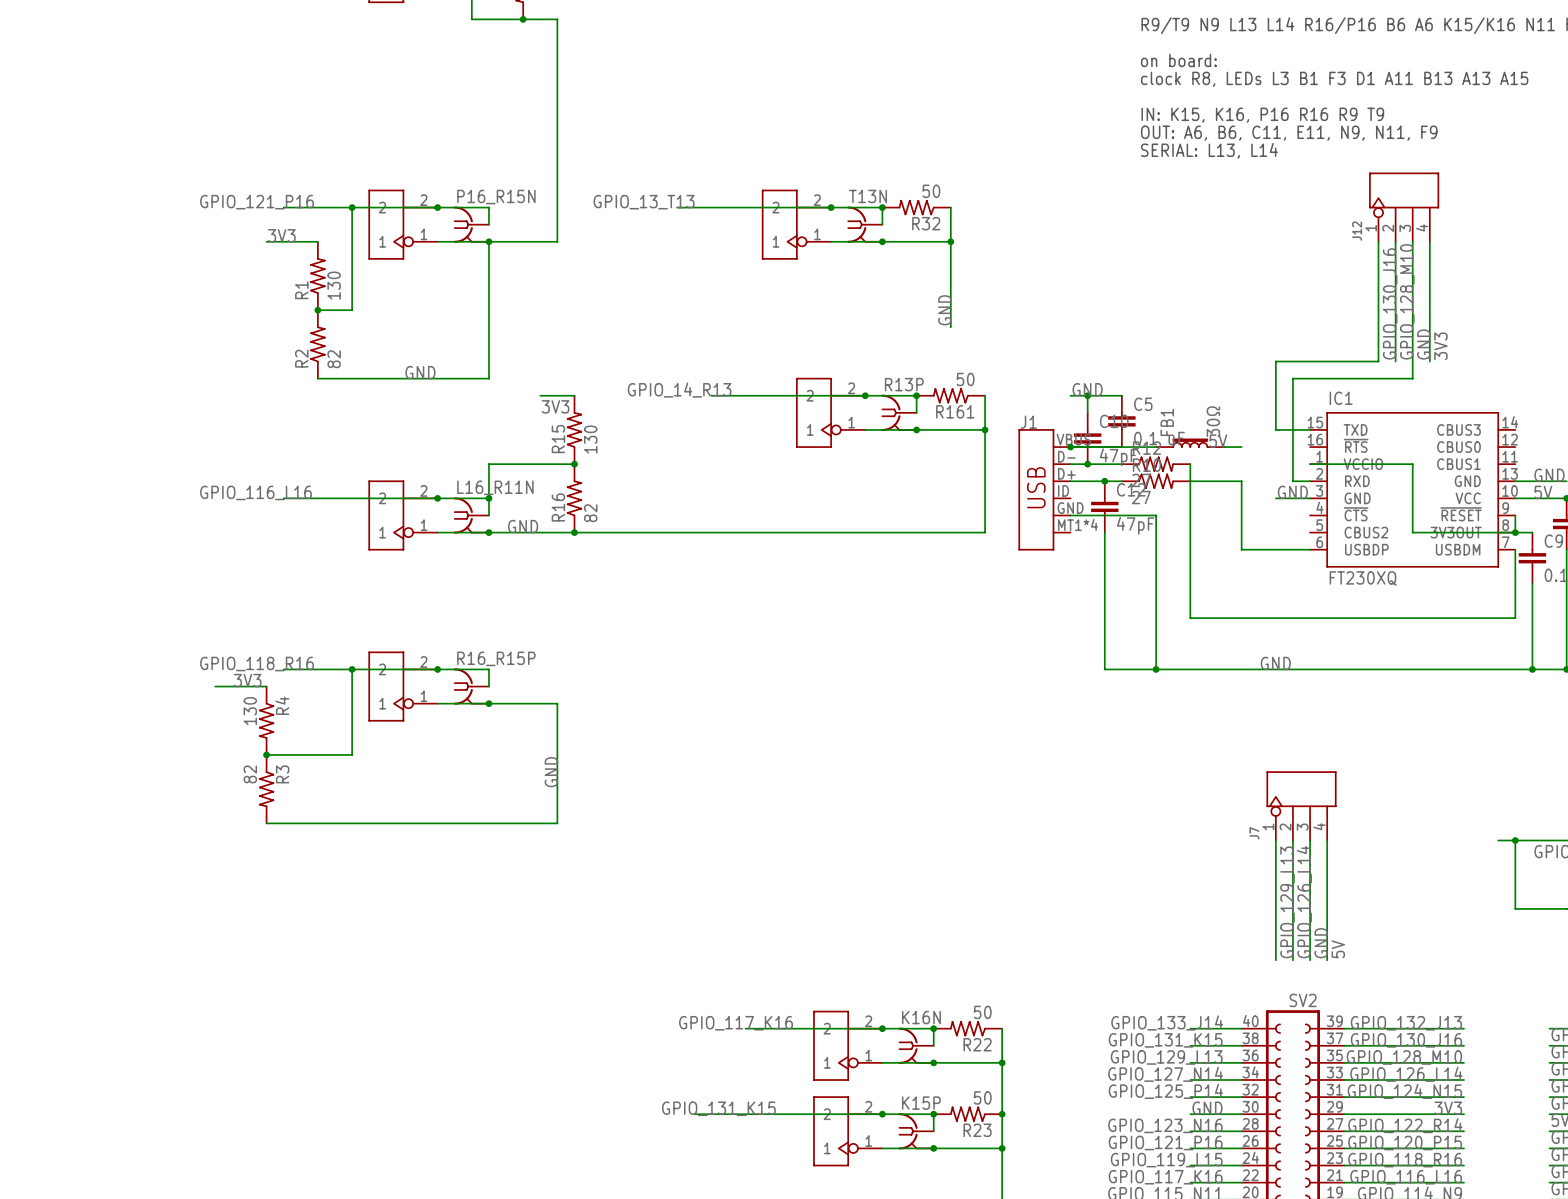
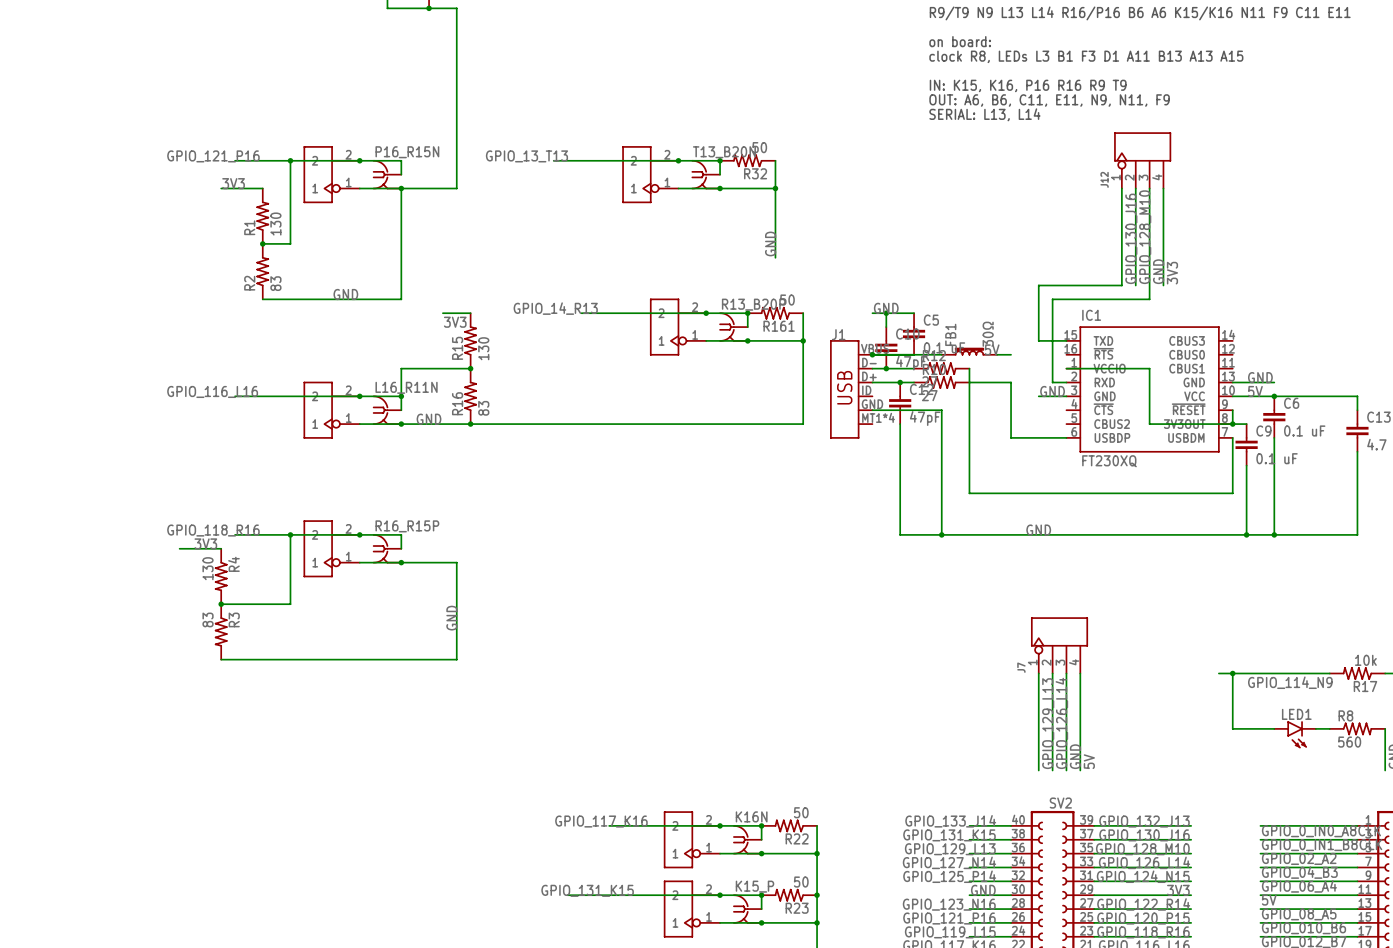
T13N name: T13N (868, 196) -> T13_B20N (724, 152)
R2 value: 82 (334, 359) -> 83 (275, 283)
R13P name: R13P (904, 384) -> R13_B20P (753, 304)
R16 value: 82 (590, 513) -> 83 (483, 408)
R3 value: 82 (250, 774) -> 83 (208, 619)
K15P name: K15P (921, 1103) -> K15_P (754, 886)

